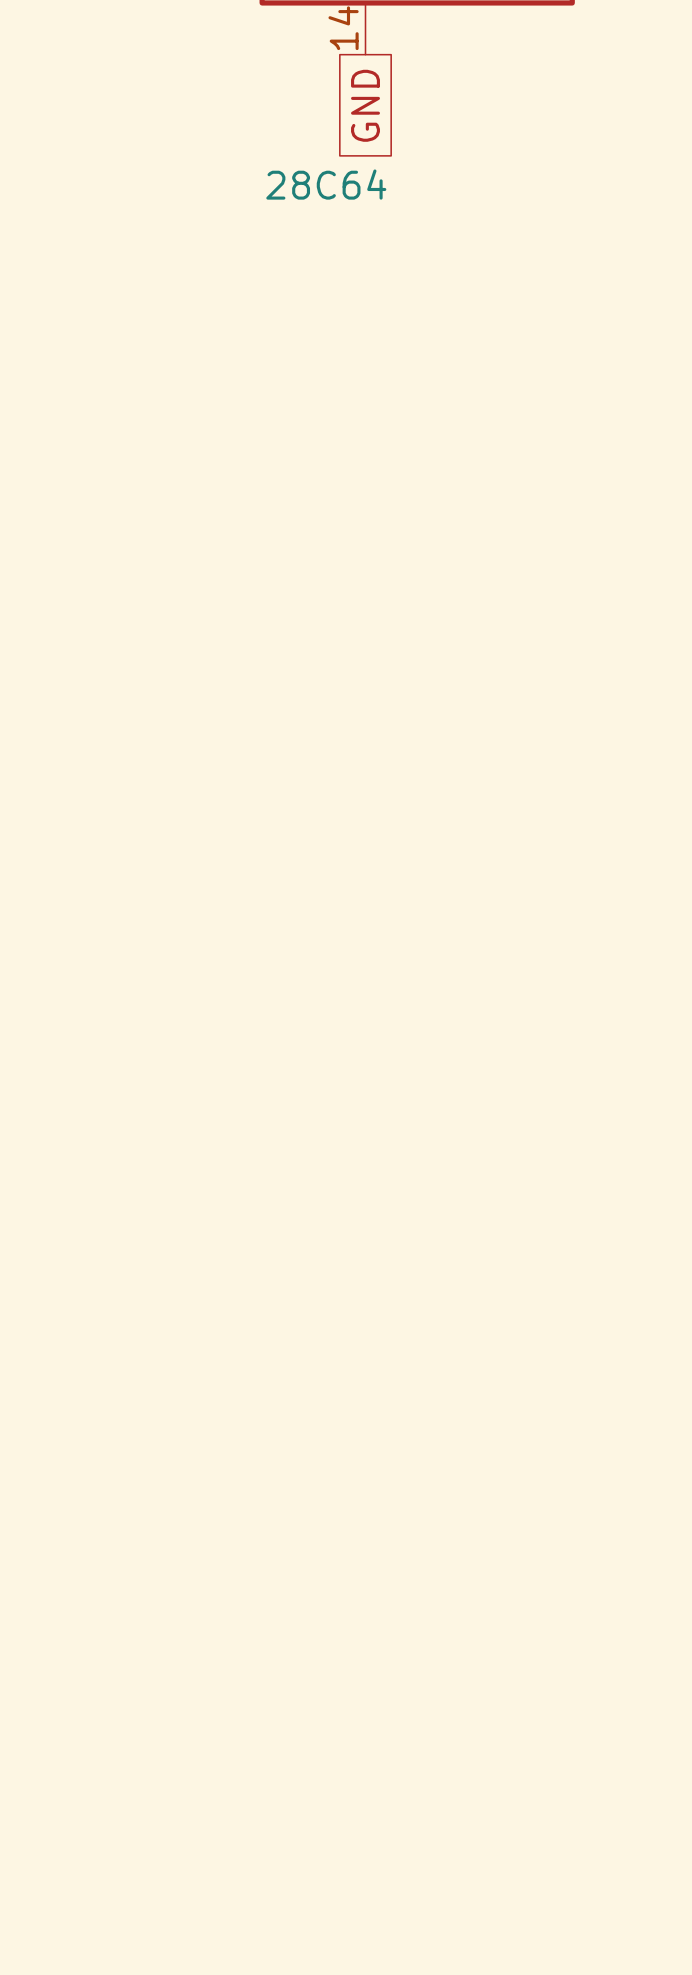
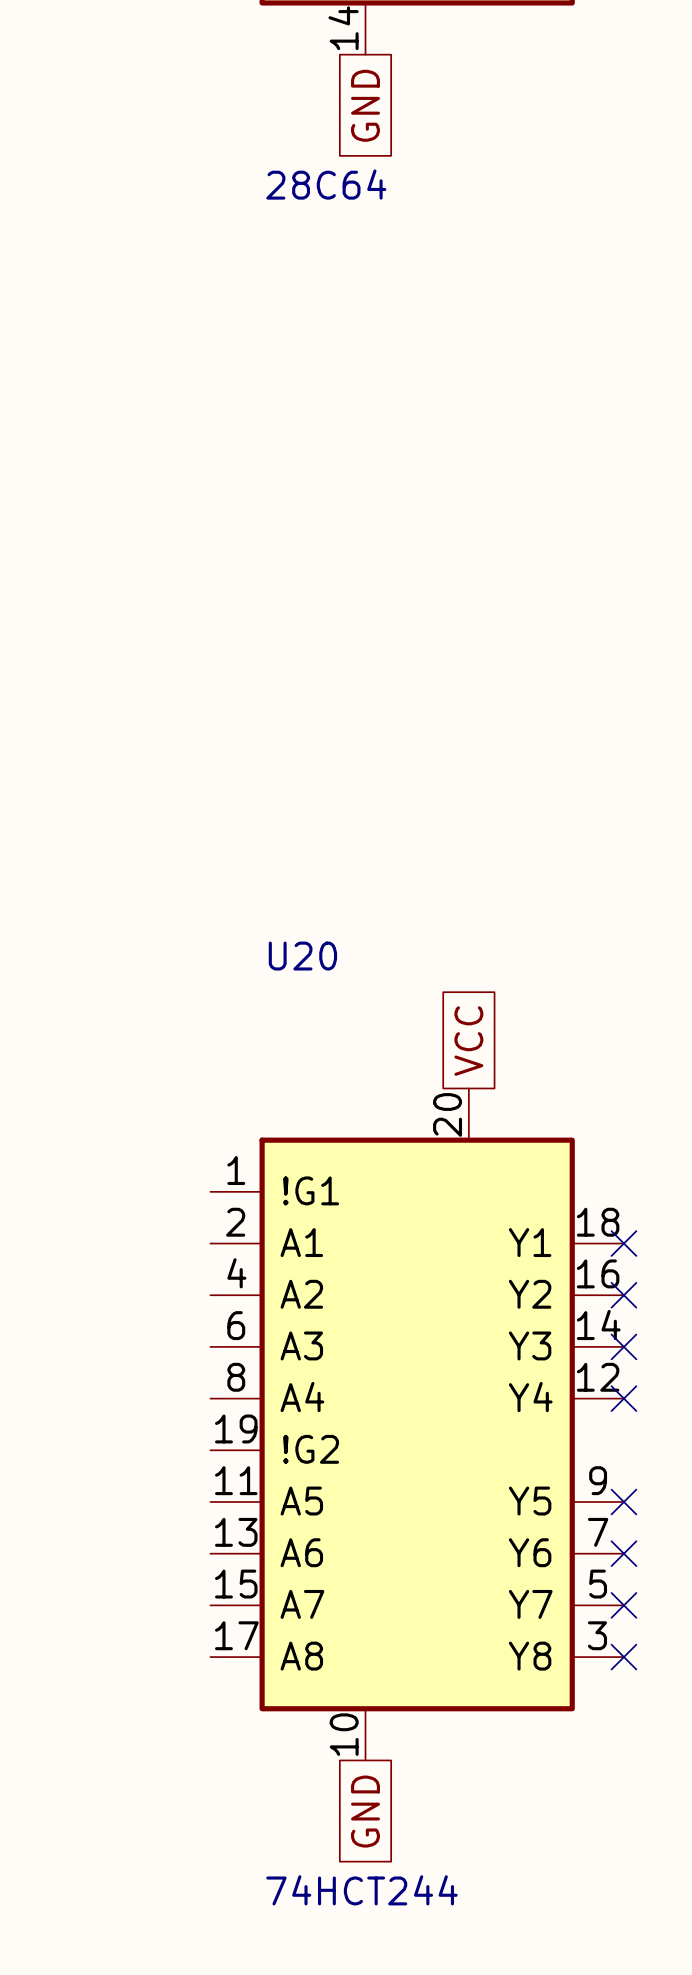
global label: none -> VCC (468, 1041)
no-connect mark: none -> (623, 1243)
no-connect mark: none -> (623, 1295)
no-connect mark: none -> (623, 1346)
no-connect mark: none -> (623, 1398)
U20: none -> 74HCT244 (417, 1424)
no-connect mark: none -> (623, 1501)
no-connect mark: none -> (623, 1553)
no-connect mark: none -> (623, 1605)
no-connect mark: none -> (623, 1657)
global label: none -> GND (365, 1811)

